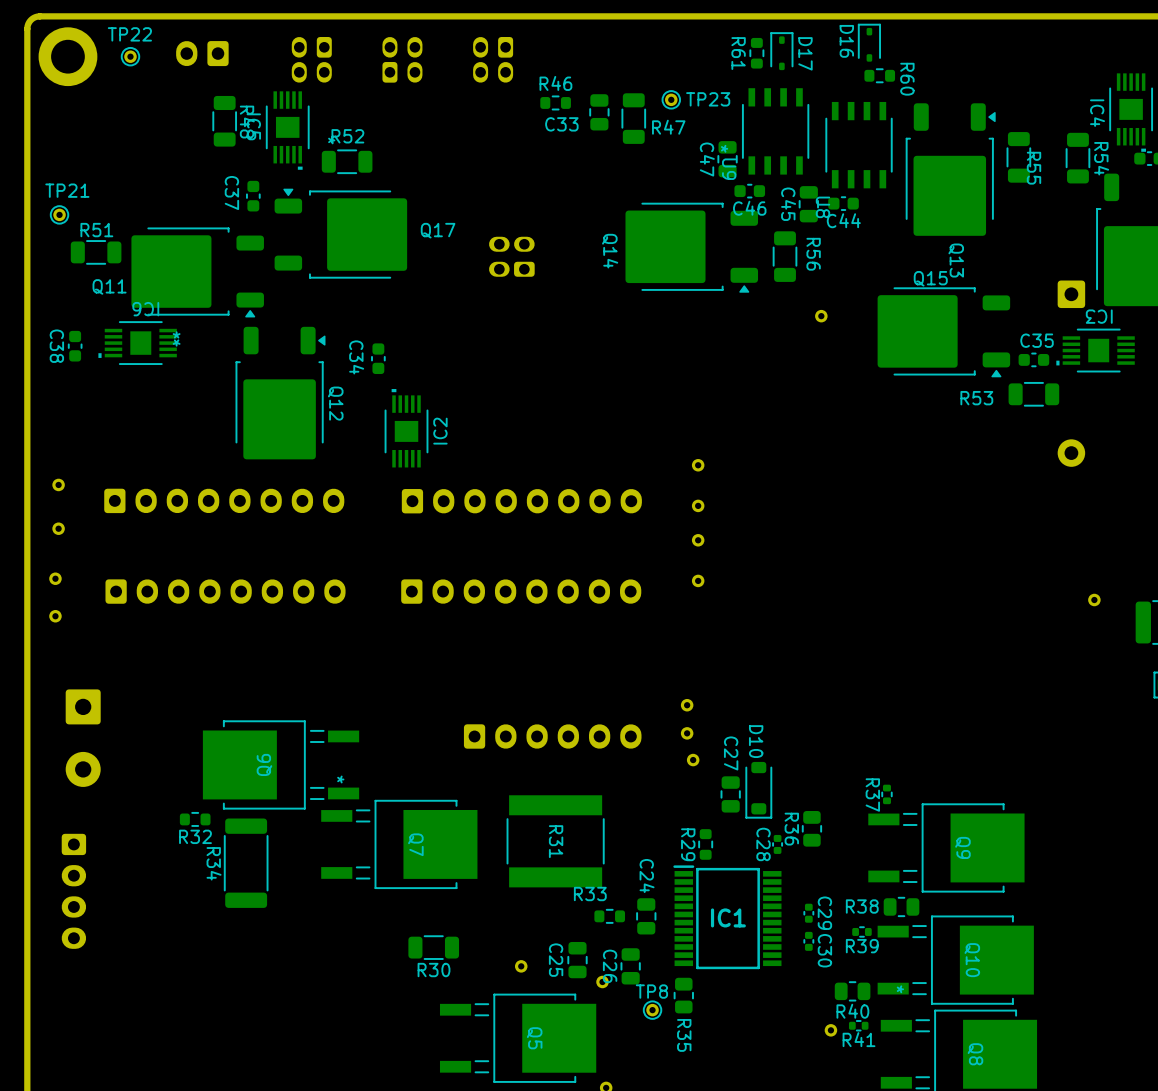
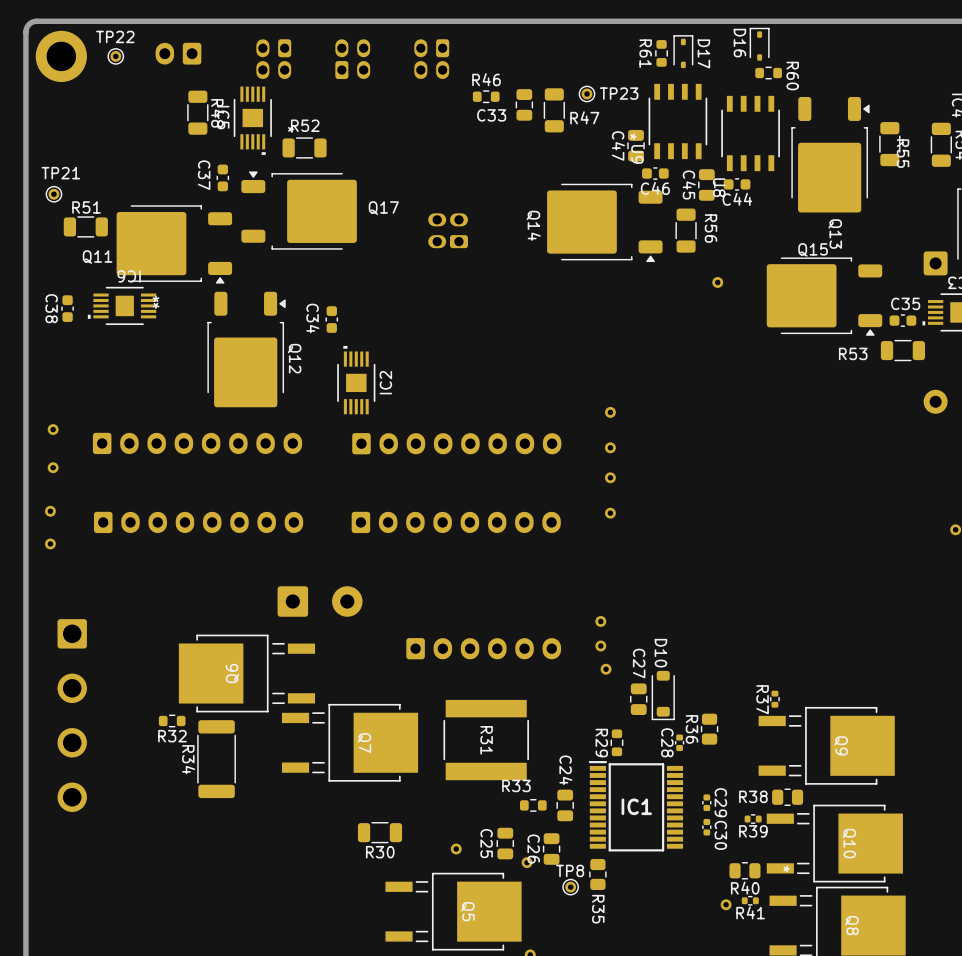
part rotation: 0° (83, 738) -> 90° counterclockwise (320, 601)
part position: (83, 738) -> (320, 601)
Q7 text: * (340, 779) -> none
part: none -> (72, 715)
part: (73, 891) -> none

